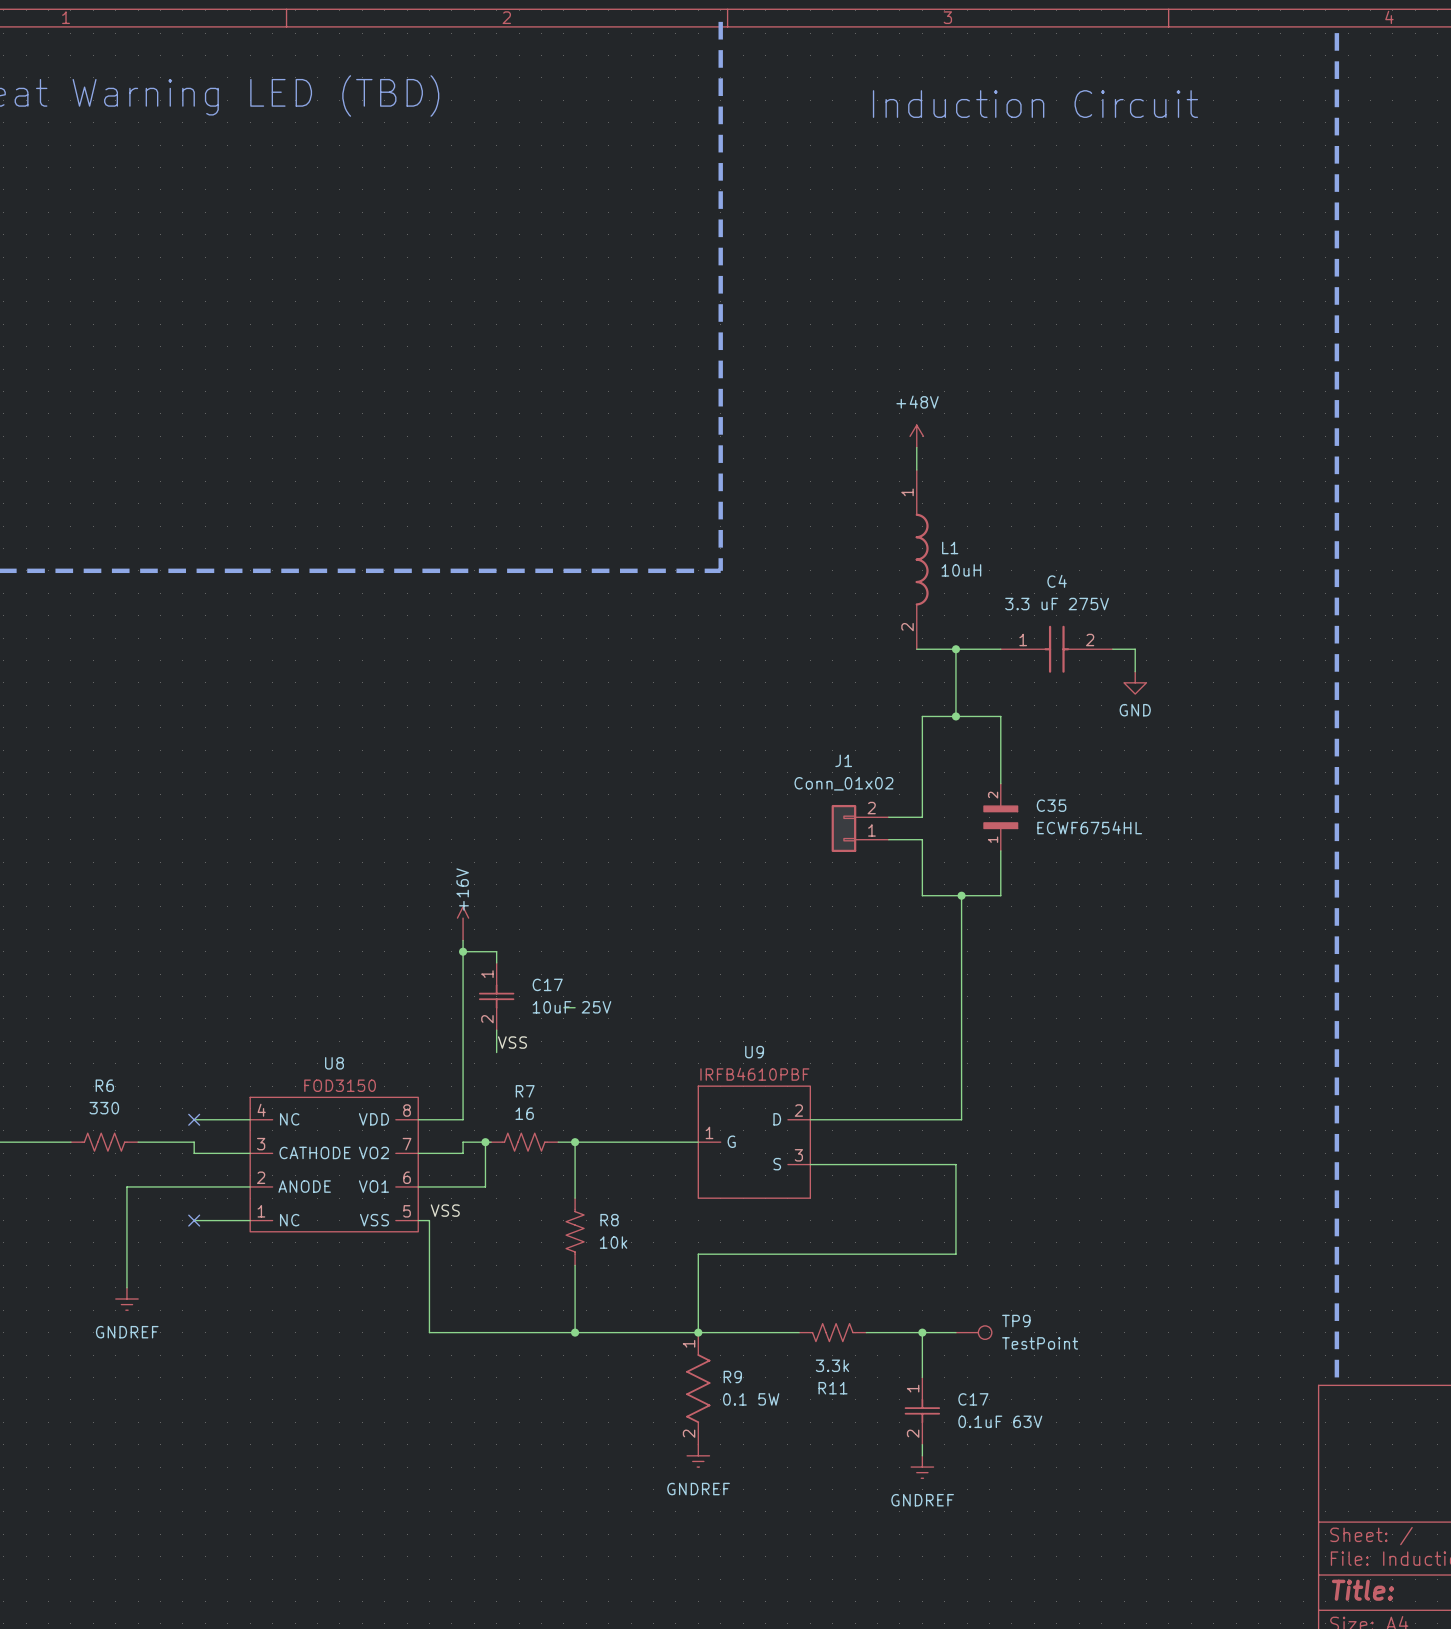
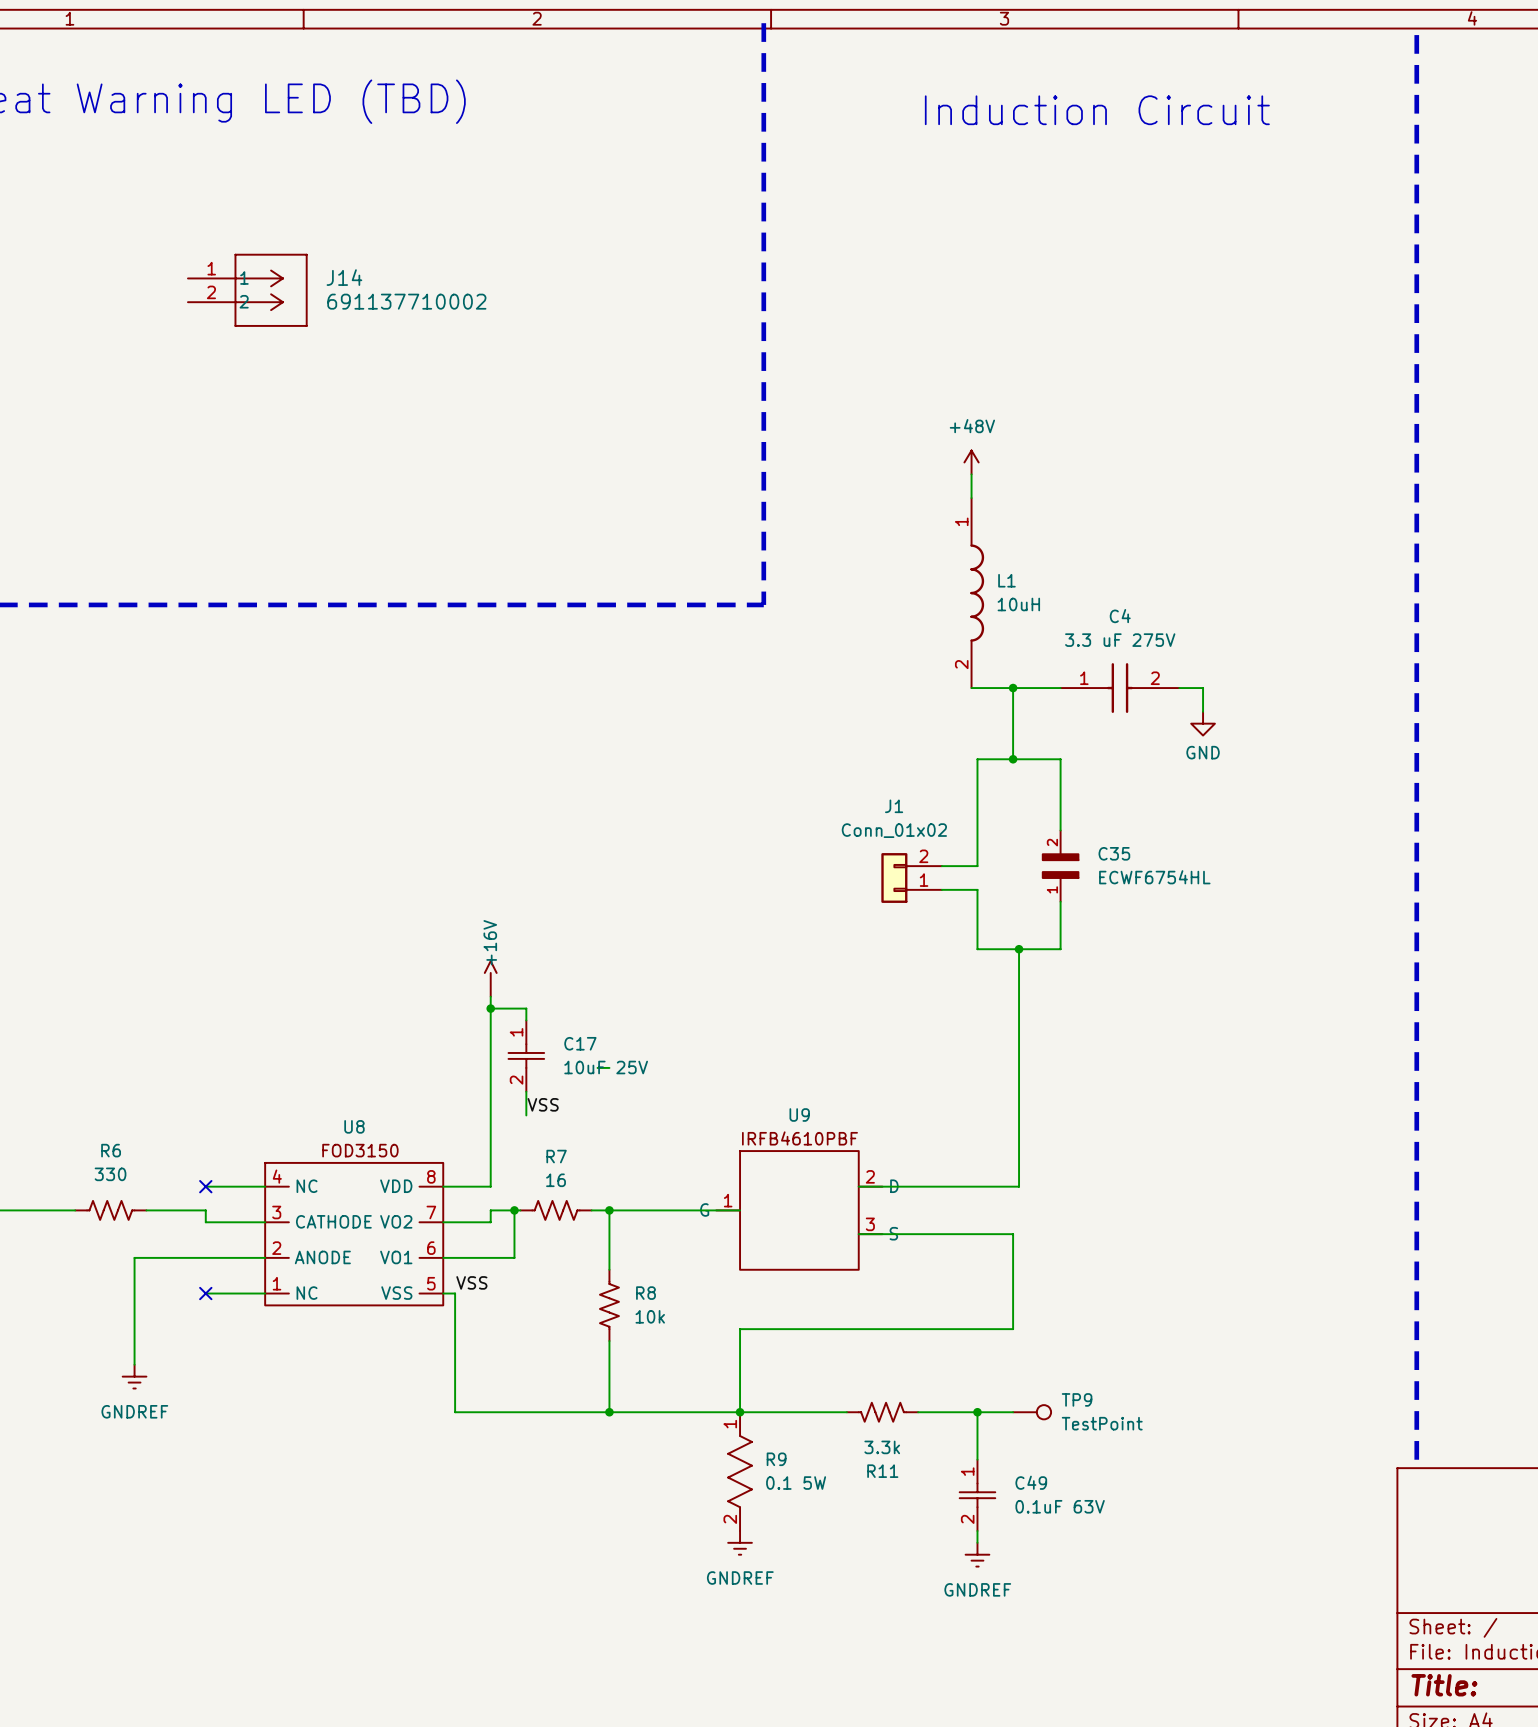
J14: none -> 691137710002 (247, 290)
U9 symbol: [698, 1086, 811, 1199] -> [716, 1151, 883, 1270]
C17 name: C17 (973, 1399) -> C49 (1031, 1482)

